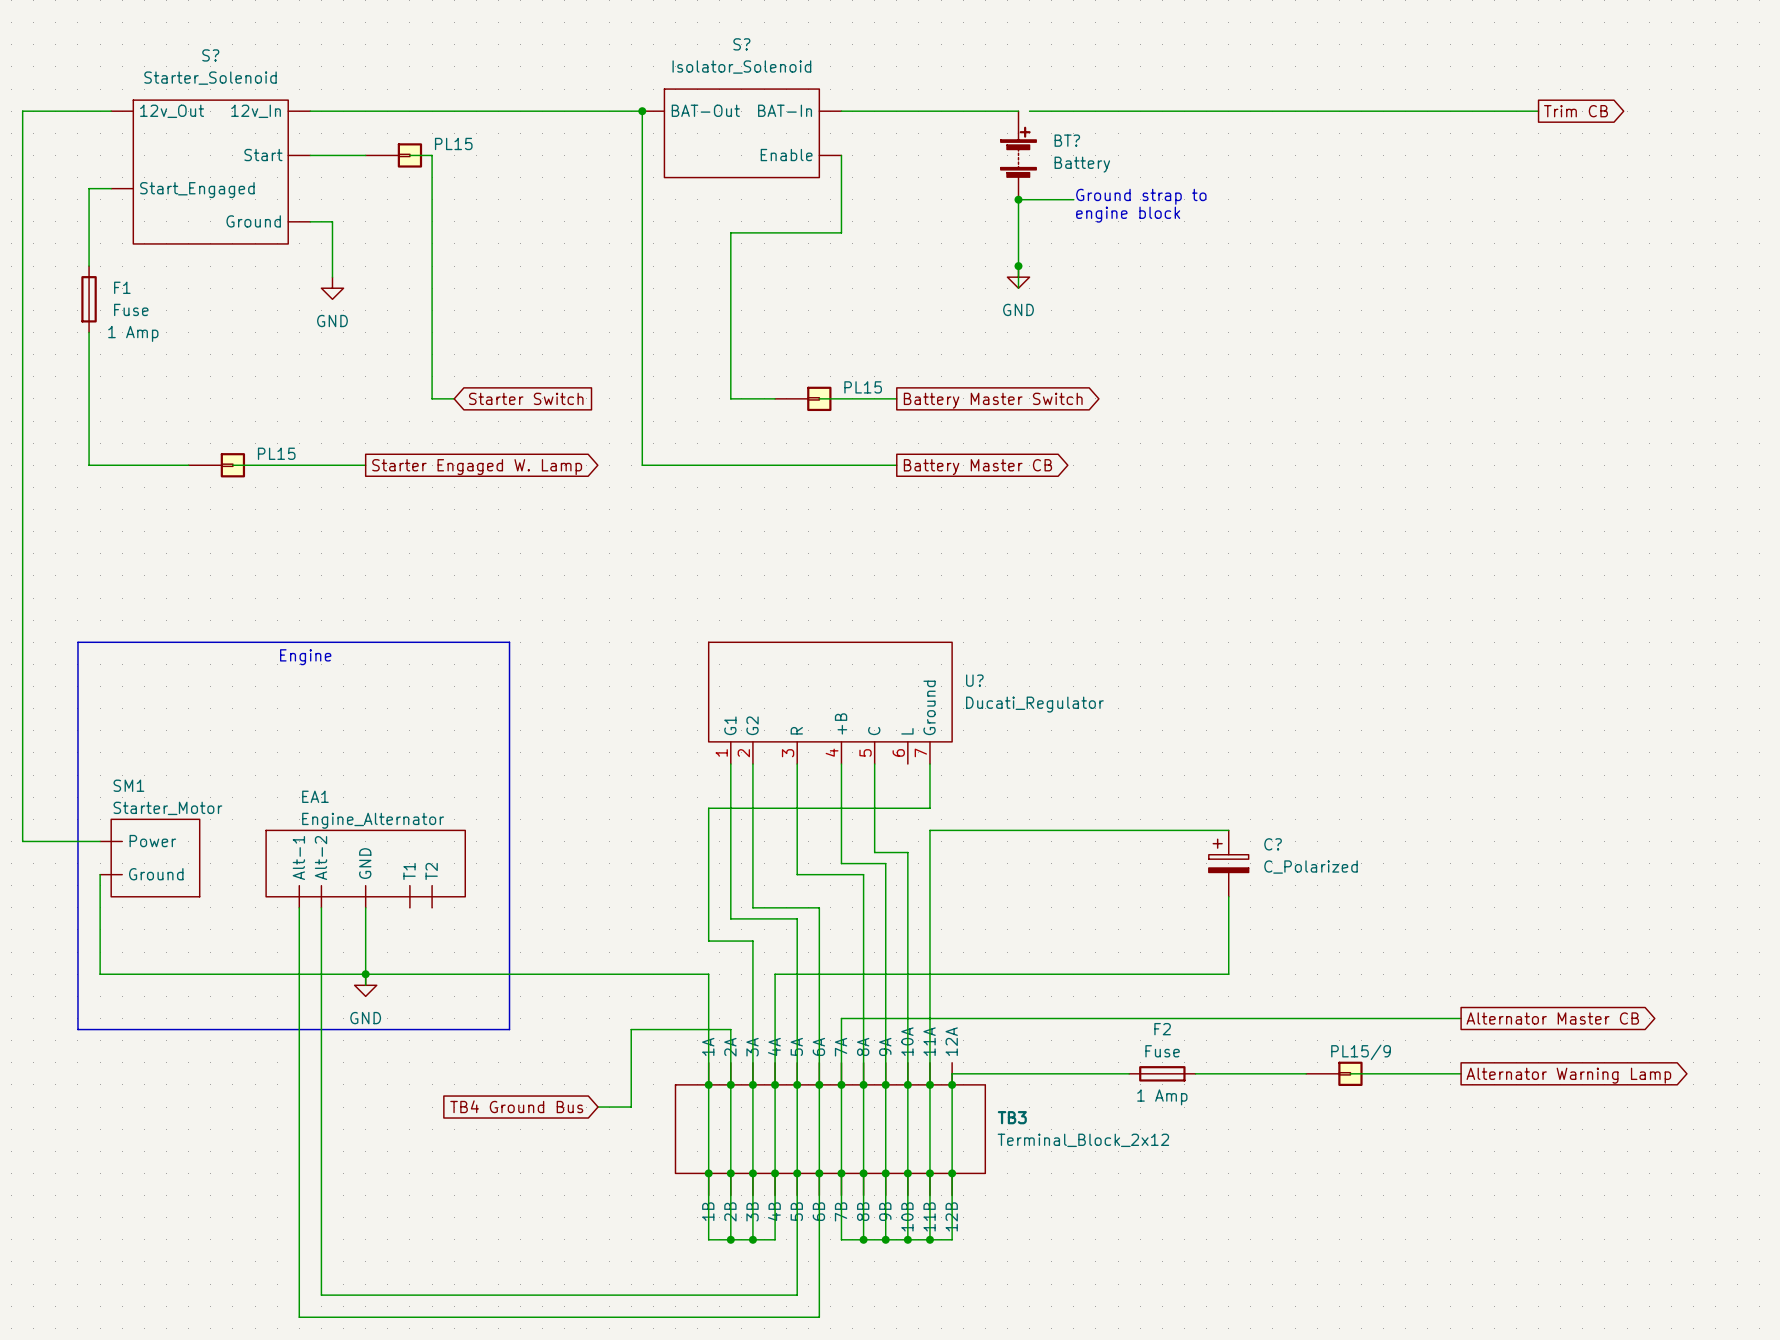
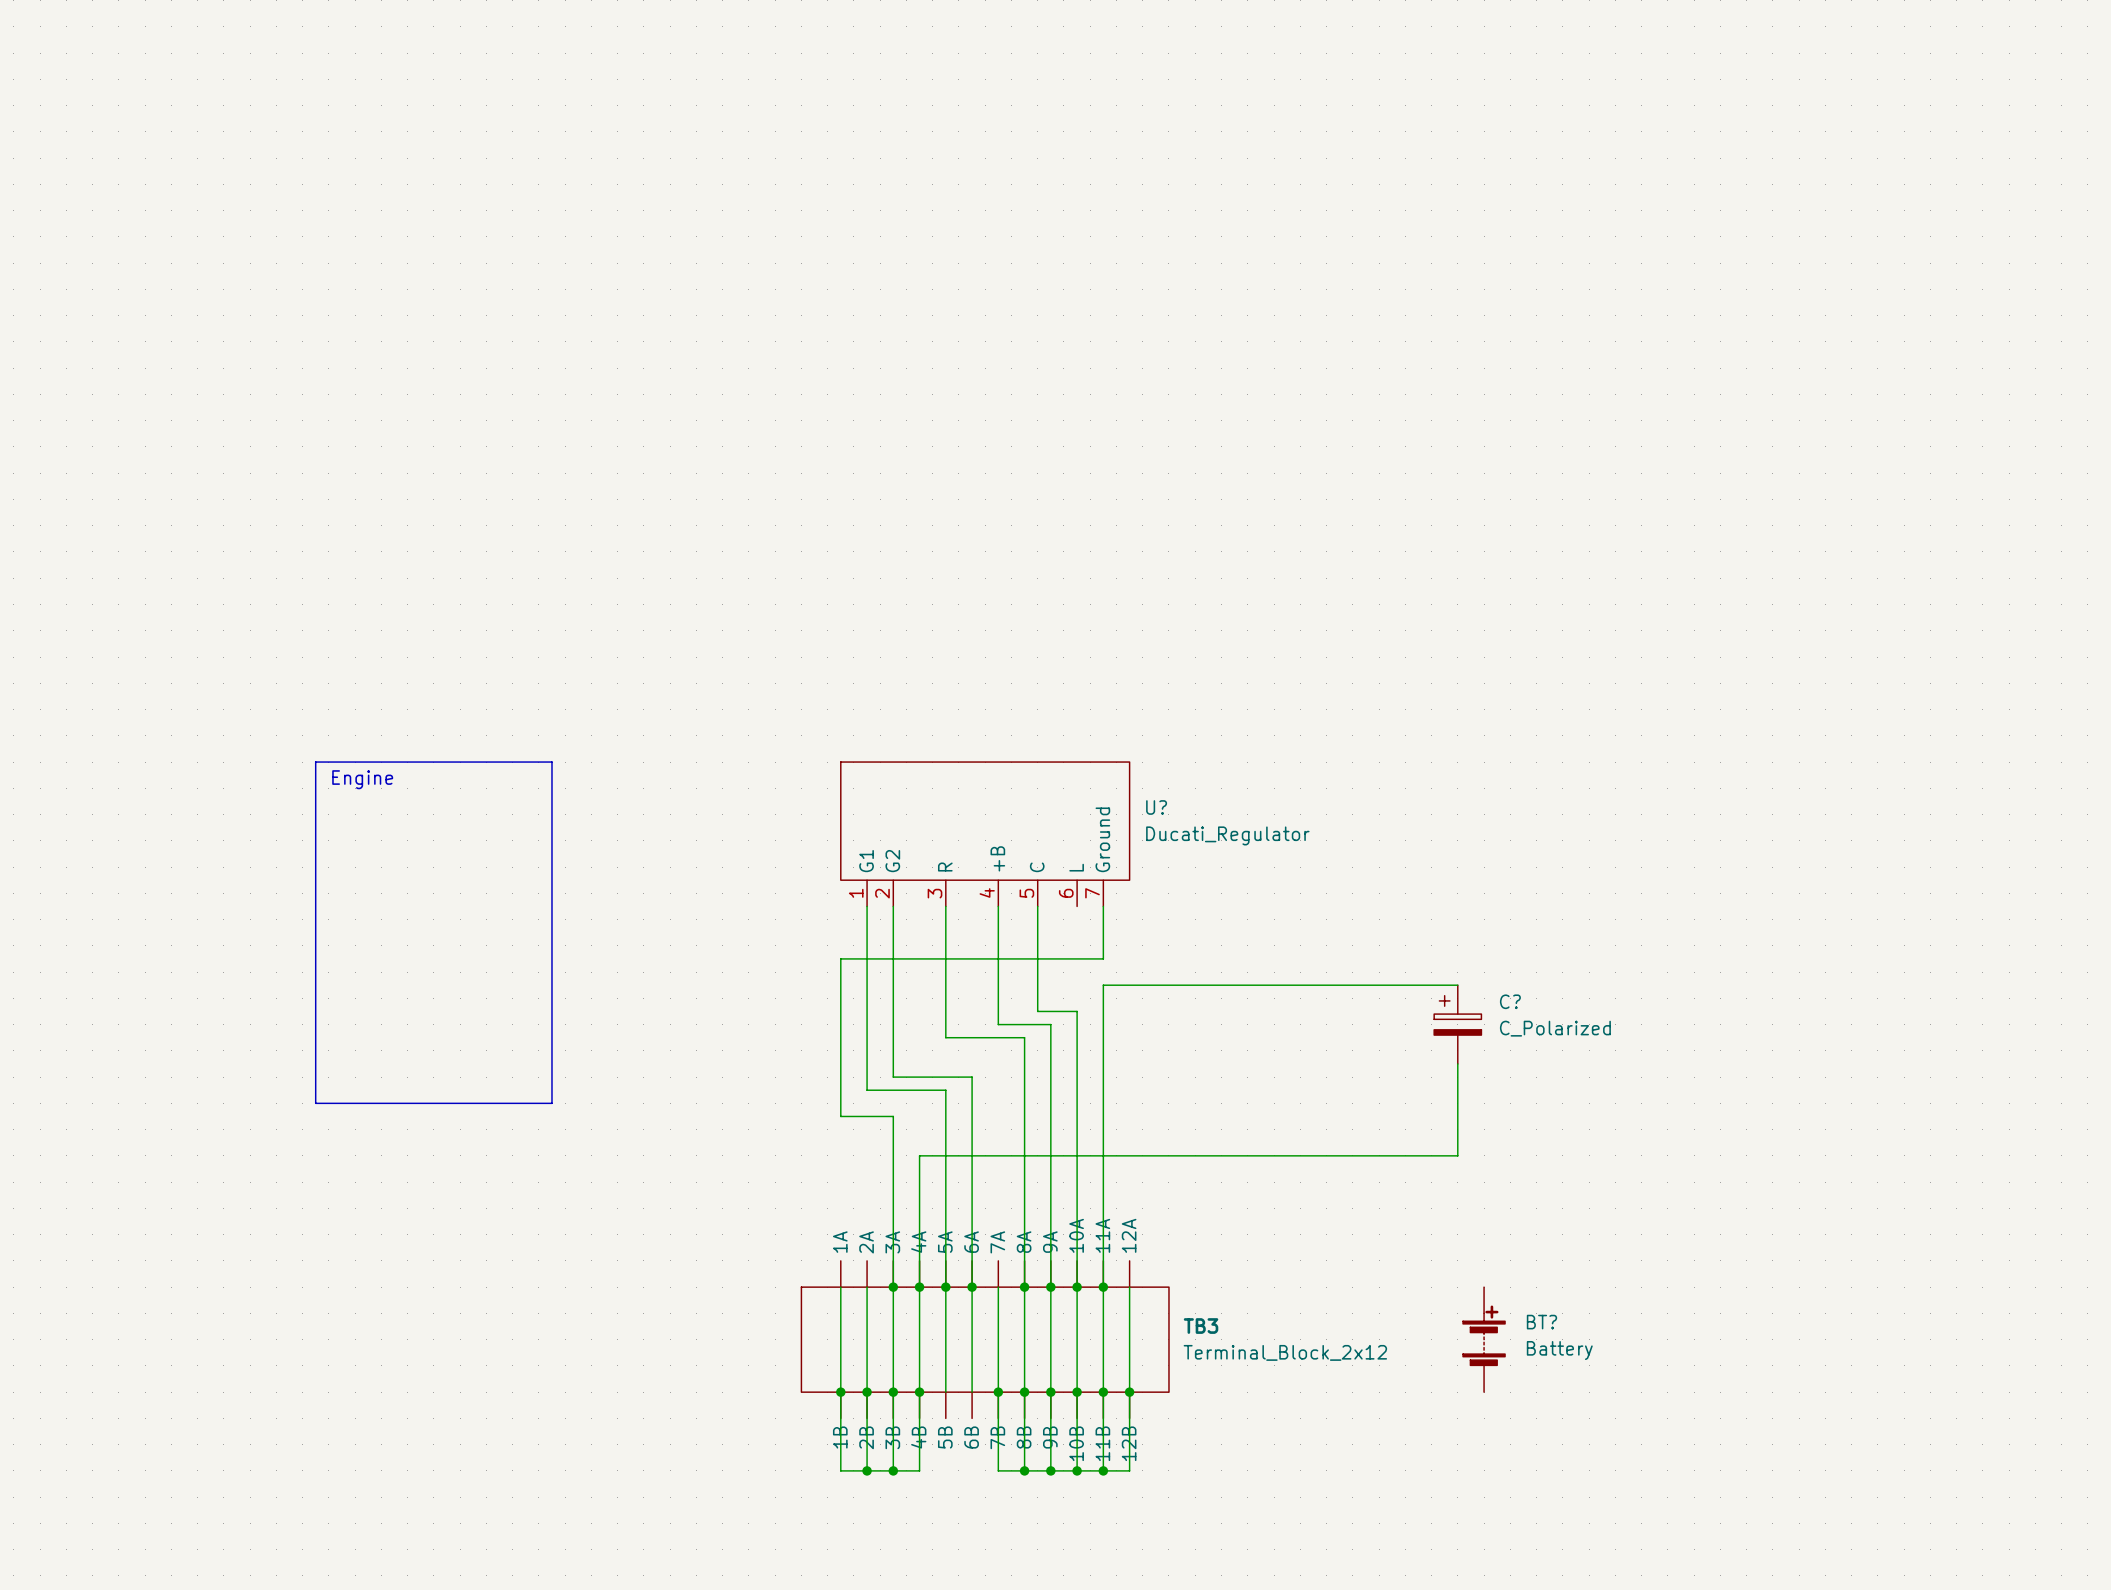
wire: (111, 111) (22, 111) (22, 841) (100, 841) -> none
wire: (310, 111) (642, 111) (642, 465) (896, 465) -> none
junction: (642, 111) -> none
wire: (841, 111) (1018, 111) -> none
wire: (1029, 111) (1538, 111) -> none
global label: Trim CB (1575, 111) -> none
S?: Isolator_Solenoid (741, 133) -> none
wire: (310, 155) (365, 155) -> none
PL15: (393, 155) -> none
wire: (409, 155) (432, 155) (432, 398) (454, 398) -> none
wire: (841, 155) (841, 232) (730, 232) (730, 398) (775, 398) -> none
BT?: Battery (1018, 155) -> none
S?: Starter_Solenoid (210, 172) -> none
wire: (111, 188) (89, 188) (89, 266) -> none
text: Ground strap to (1141, 196) -> none
junction: (1018, 199) -> none
wire: (1073, 199) (1018, 199) (1018, 288) -> none
text: engine block (1128, 214) -> none
wire: (310, 221) (332, 221) (332, 277) -> none
junction: (1018, 266) -> none
power symbol: GND (1018, 277) -> none
power symbol: GND (332, 288) -> none
F1: Fuse (89, 299) -> none
wire: (89, 332) (89, 465) (188, 465) -> none
global label: Starter Switch (526, 398) -> none
PL15: (803, 398) -> none
wire: (819, 398) (896, 398) -> none
global label: Battery Master Switch (993, 400) -> none
PL15: (216, 465) -> none
wire: (232, 465) (365, 465) -> none
global label: Starter Engaged W. Lamp (477, 467) -> none
global label: Battery Master CB (977, 467) -> none
line: (266, 642) (77, 642) (77, 1029) (509, 1029) (509, 642) (465, 642) -> (315, 762) (315, 1103) (551, 1103) (551, 762)
SM1: Starter_Motor (149, 858) -> none
EA1: Engine_Alternator (365, 869) -> none
wire: (100, 874) (100, 974) (708, 974) (708, 1084) -> none
wire: (299, 907) (299, 1317) (819, 1317) (819, 1173) -> none
wire: (321, 907) (321, 1295) (797, 1295) (797, 1173) -> none
wire: (365, 907) (365, 985) -> none
junction: (365, 974) -> none
power symbol: GND (365, 985) -> none
wire: (1461, 1018) (841, 1018) (841, 1084) -> none
global label: Alternator Master CB (1552, 1018) -> none
wire: (1129, 1073) (952, 1073) (952, 1084) -> none
F2: Fuse (1162, 1073) -> none
wire: (1195, 1073) (1306, 1073) -> none
PL15/9: (1334, 1073) -> none
wire: (1350, 1073) (1461, 1073) -> none
global label: Alternator Warning Lamp (1568, 1075) -> none
junction: (708, 1084) -> none
wire: (730, 1084) (730, 1029) (631, 1029) (631, 1107) (598, 1107) -> none
junction: (730, 1084) -> none
junction: (841, 1084) -> none
junction: (952, 1084) -> none
global label: TB4 Ground Bus (516, 1106) -> none
BT?: none -> Battery (1484, 1339)
junction: (797, 1173) -> none
junction: (819, 1173) -> none

